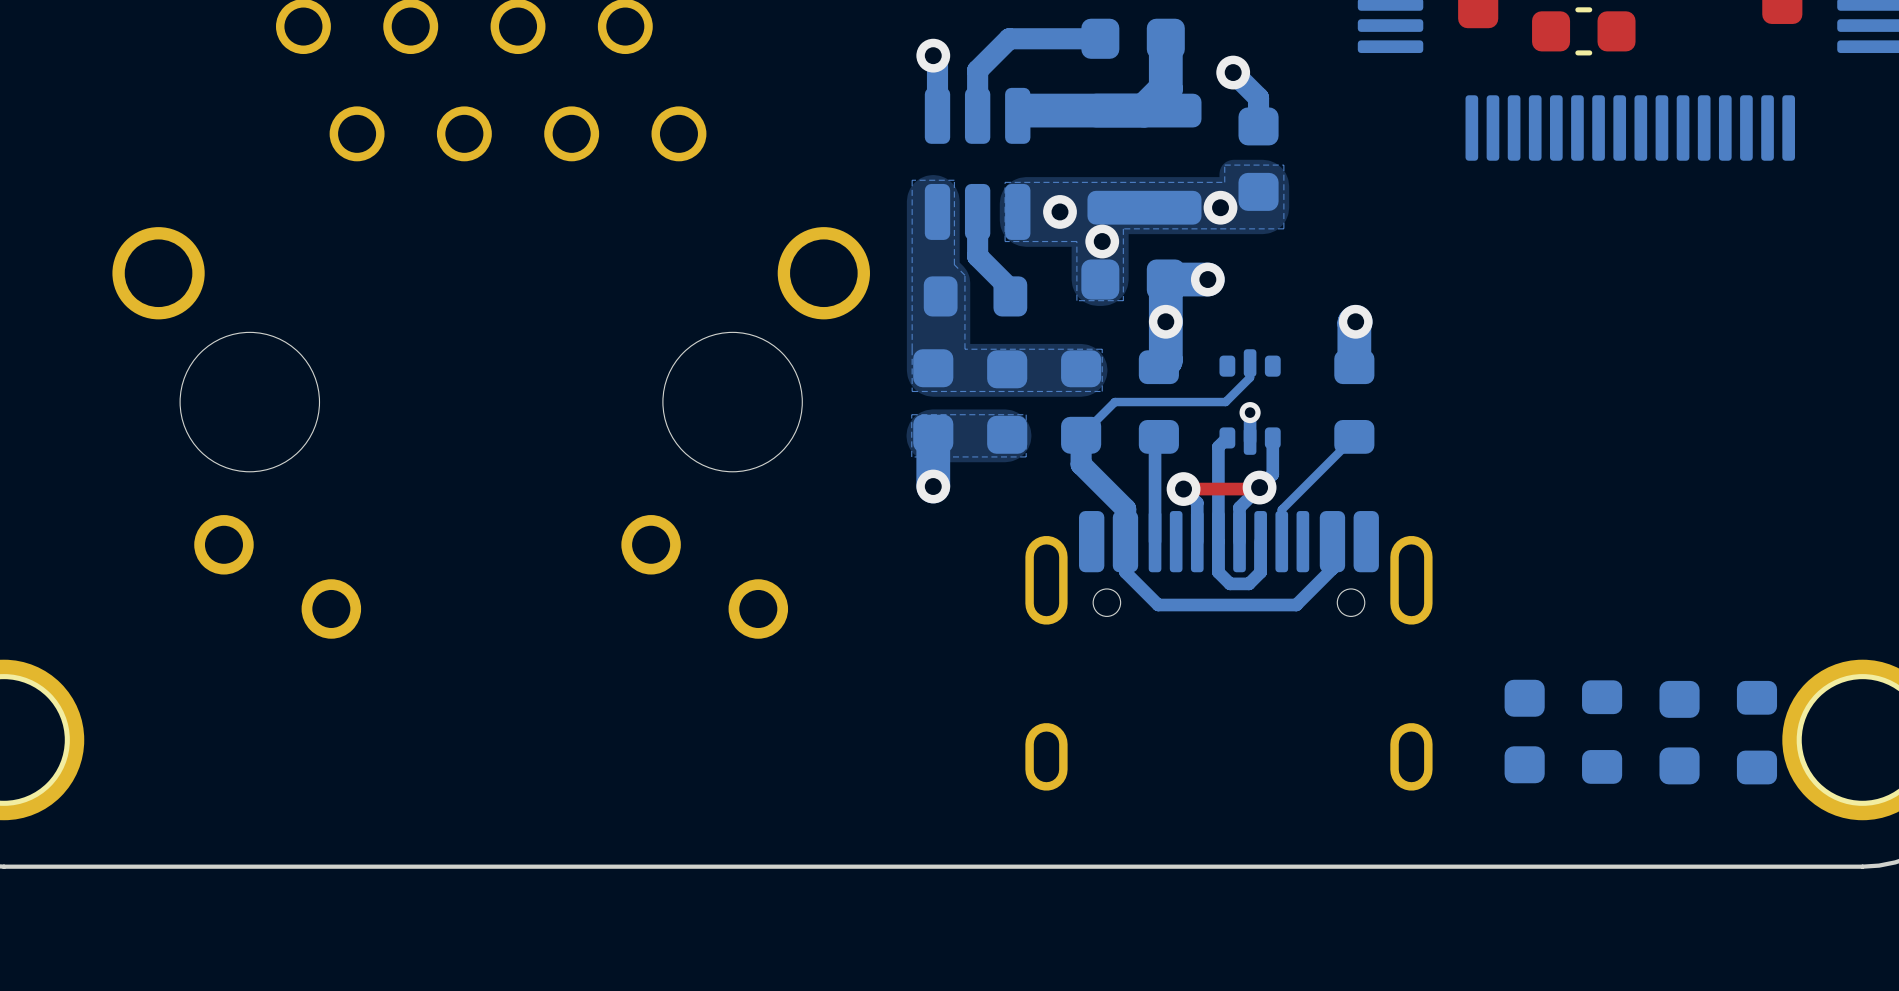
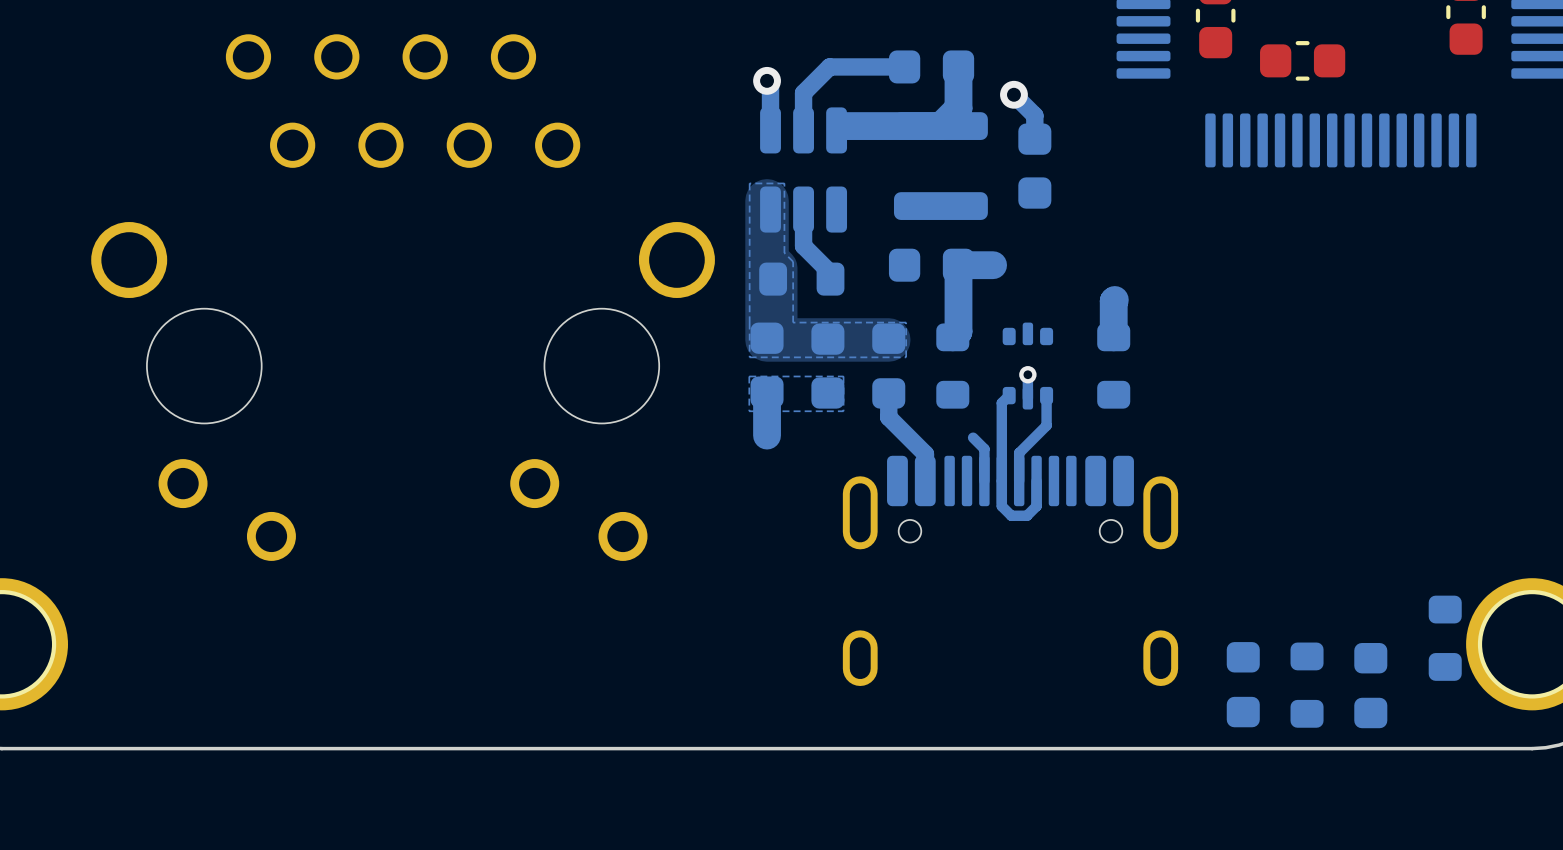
bottom zone outline: (1224, 165) (1224, 182) (1005, 182) (1005, 241) (1076, 241) (1076, 300) (1123, 300) (1123, 228) (1283, 228) (1283, 165) (1224, 165) -> none
via: (1220, 207) -> none
via: (1060, 211) -> none
via: (1102, 241) -> none
via: (1207, 279) -> none
via: (1165, 321) -> none
via: (1355, 321) -> none
bottom track: (1250, 362) (1250, 377) (1225, 402) (1114, 402) (1081, 435) -> none
bottom track: (1158, 436) (1155, 440) (1155, 541) -> none
bottom track: (1354, 437) (1281, 509) (1281, 541) -> none
via: (933, 486) -> none
via: (1259, 487) -> none
top track: (1183, 489) (1258, 489) -> none
via: (1183, 489) -> none
bottom track: (1125, 541) (1125, 572) (1158, 605) (1296, 605) (1332, 568) (1332, 541) -> none
part position: (1524, 731) -> (1243, 684)
part position: (1602, 732) -> (1307, 685)
part position: (1679, 732) -> (1370, 685)

